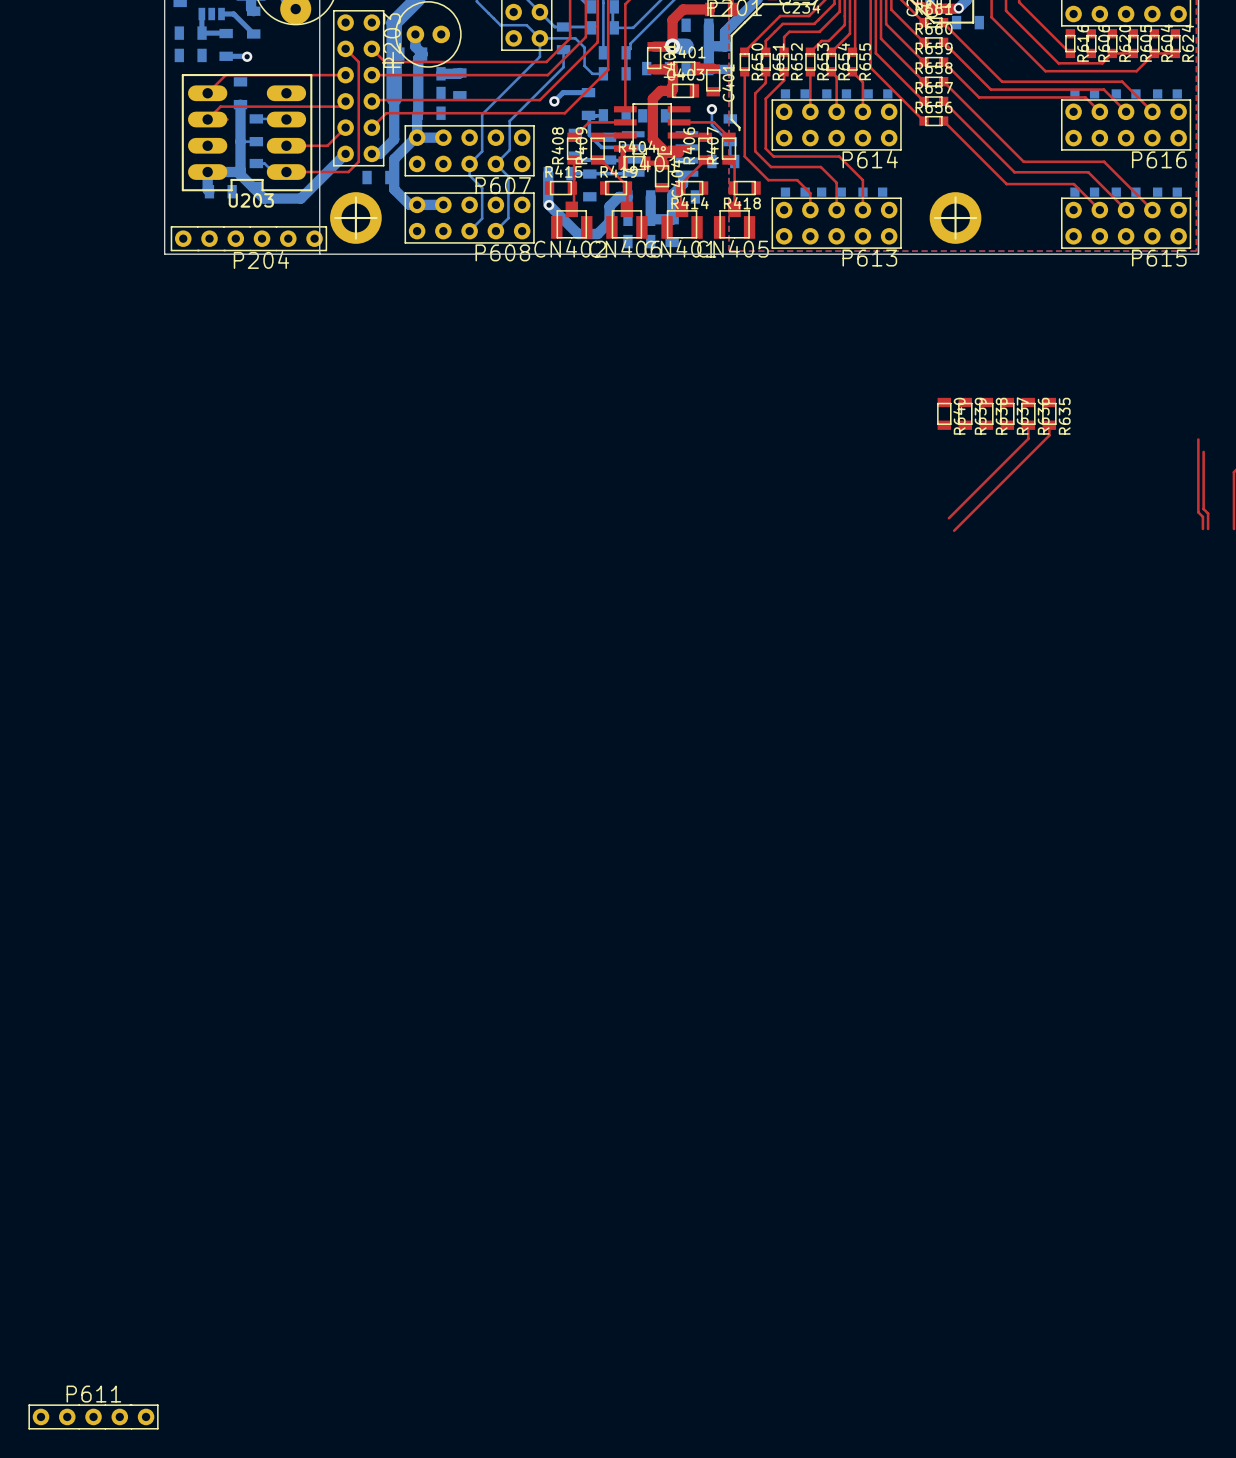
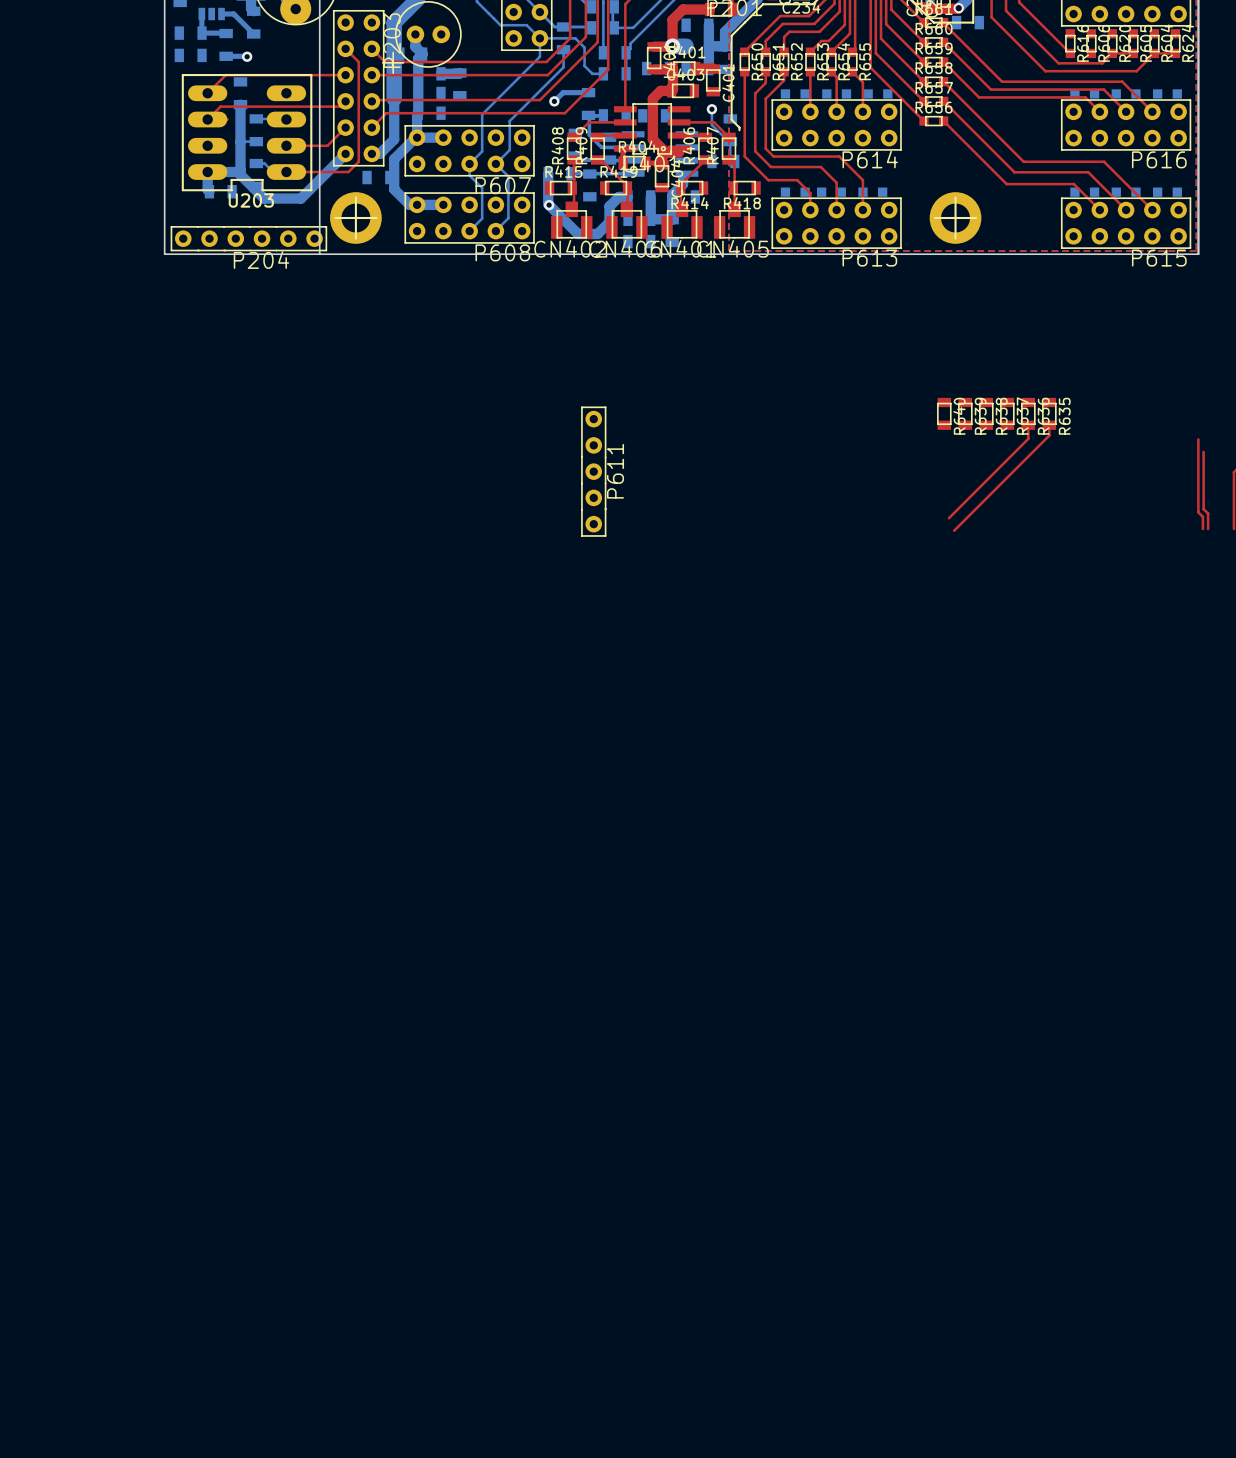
P611 rotation: 0° (93, 1416) -> 90° clockwise (593, 471)
P611 position: (93, 1416) -> (593, 471)

